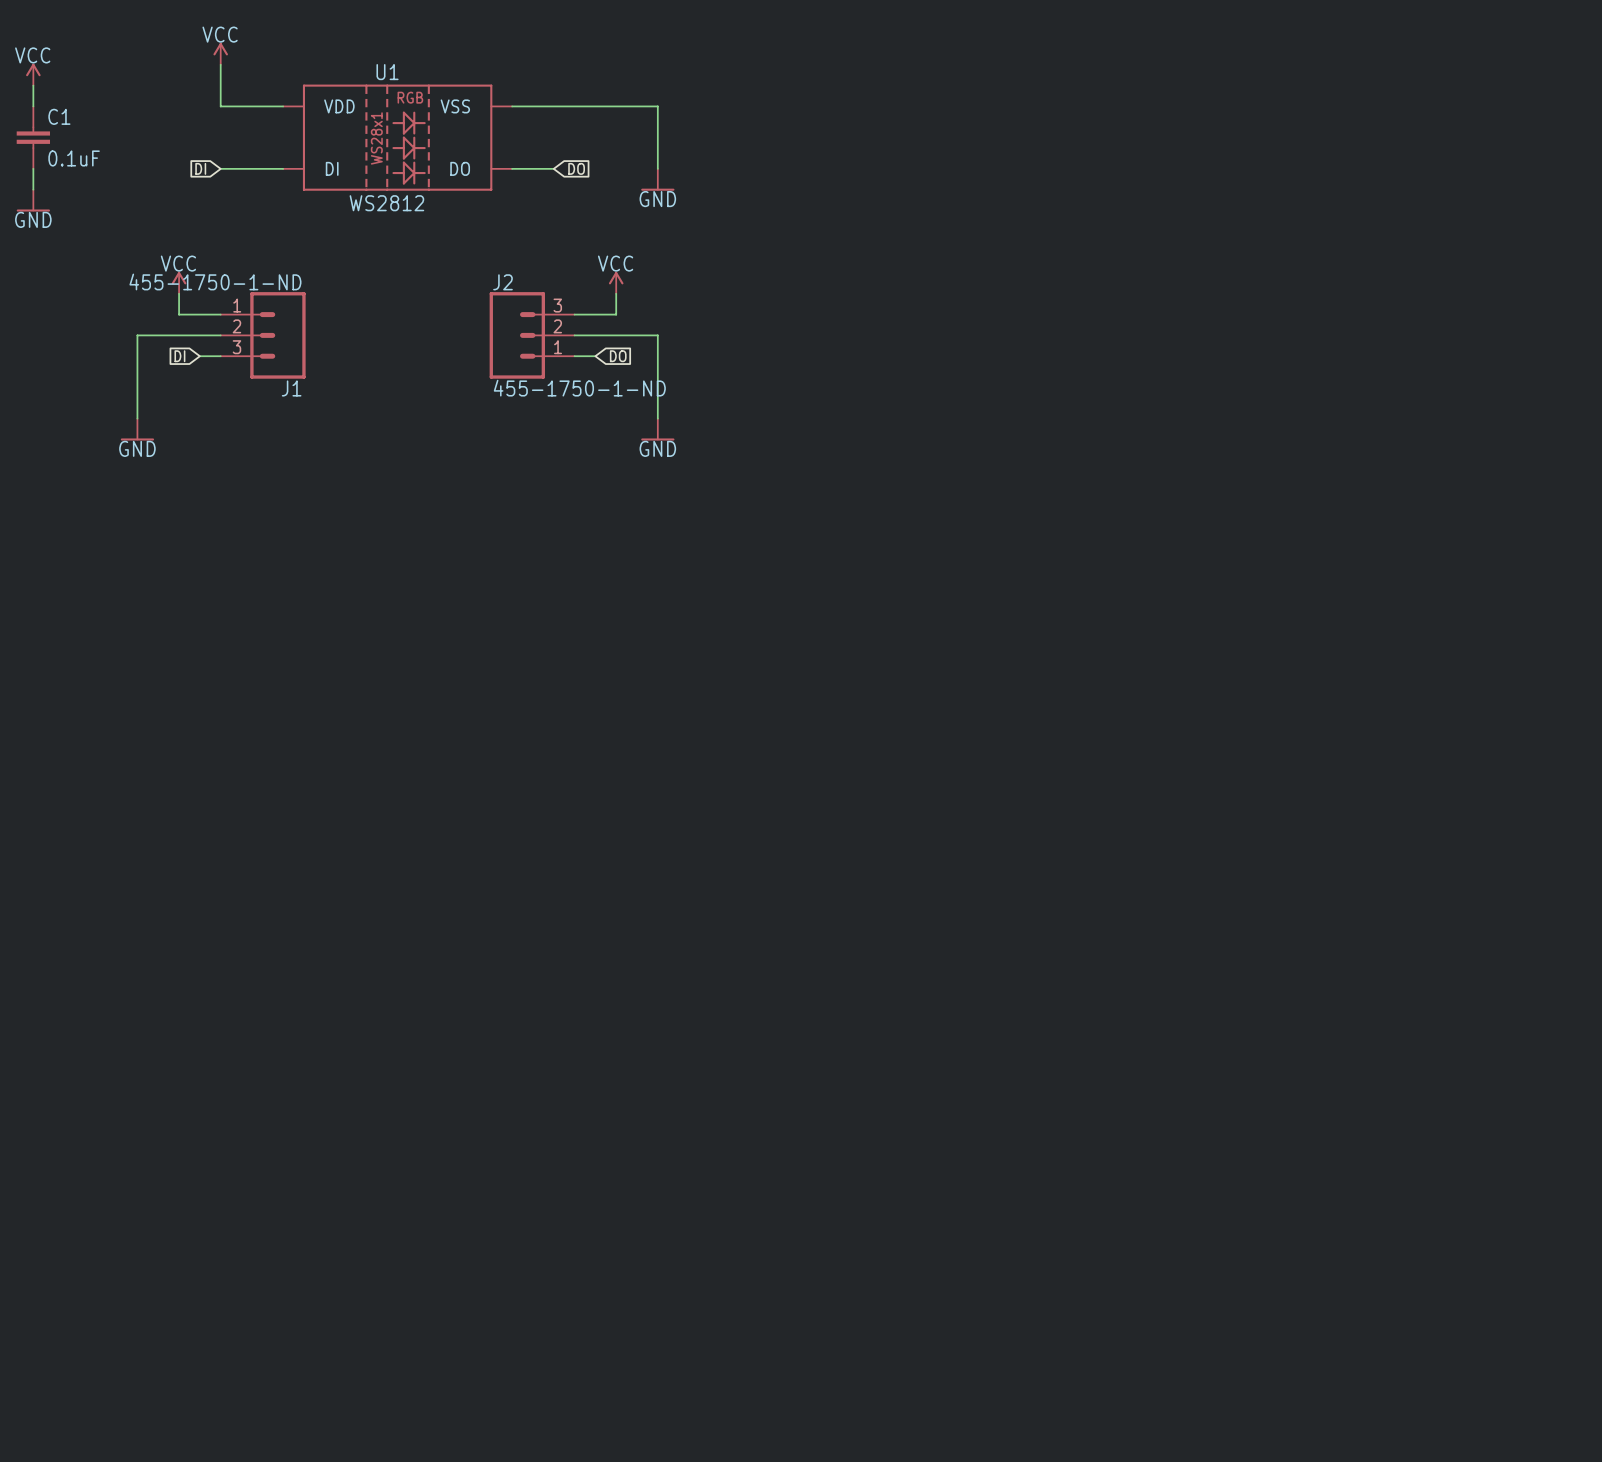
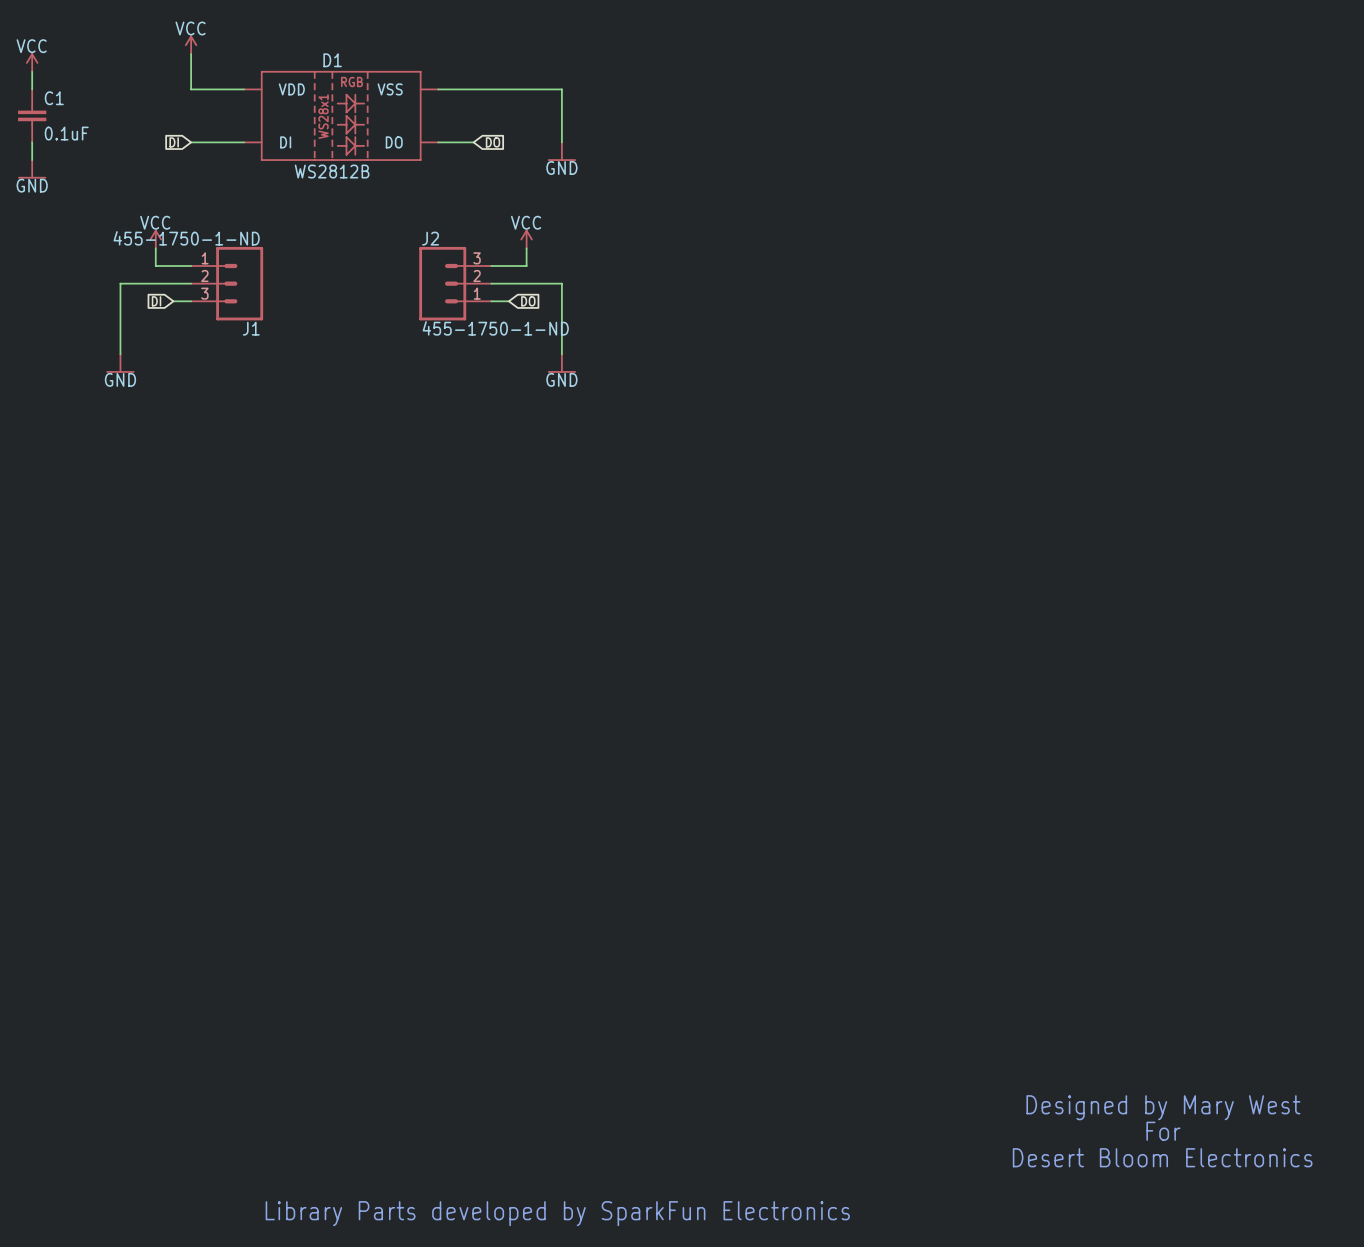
U1 name: U1 (387, 72) -> D1 (332, 60)
U1 value: WS2812 (386, 203) -> WS2812B (332, 171)
text: none -> Designed by Mary West (1163, 1107)
text: none -> For (1163, 1131)
text: none -> Desert Bloom Electronics (1162, 1157)
text: none -> Library Parts developed by SparkFun Electronics (557, 1213)

